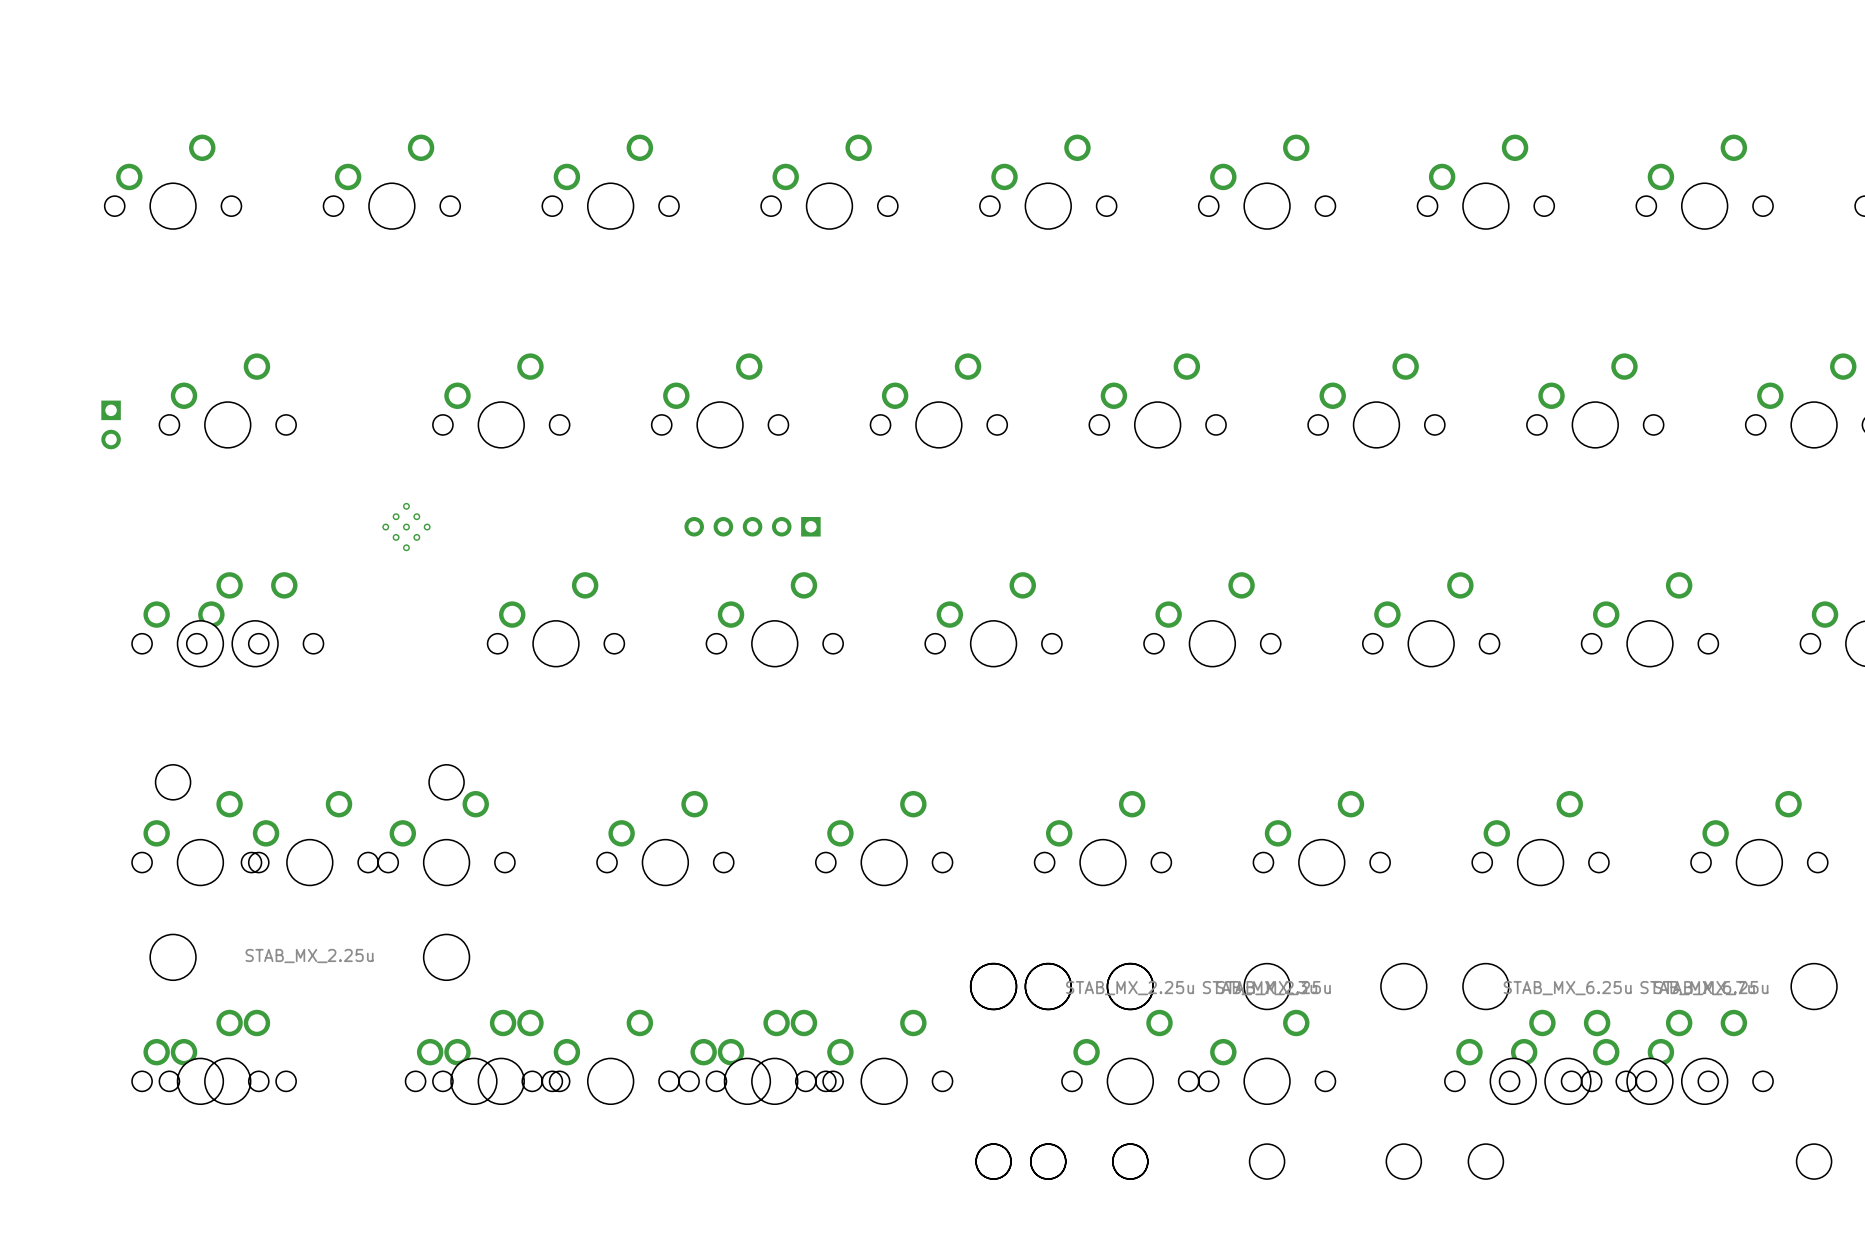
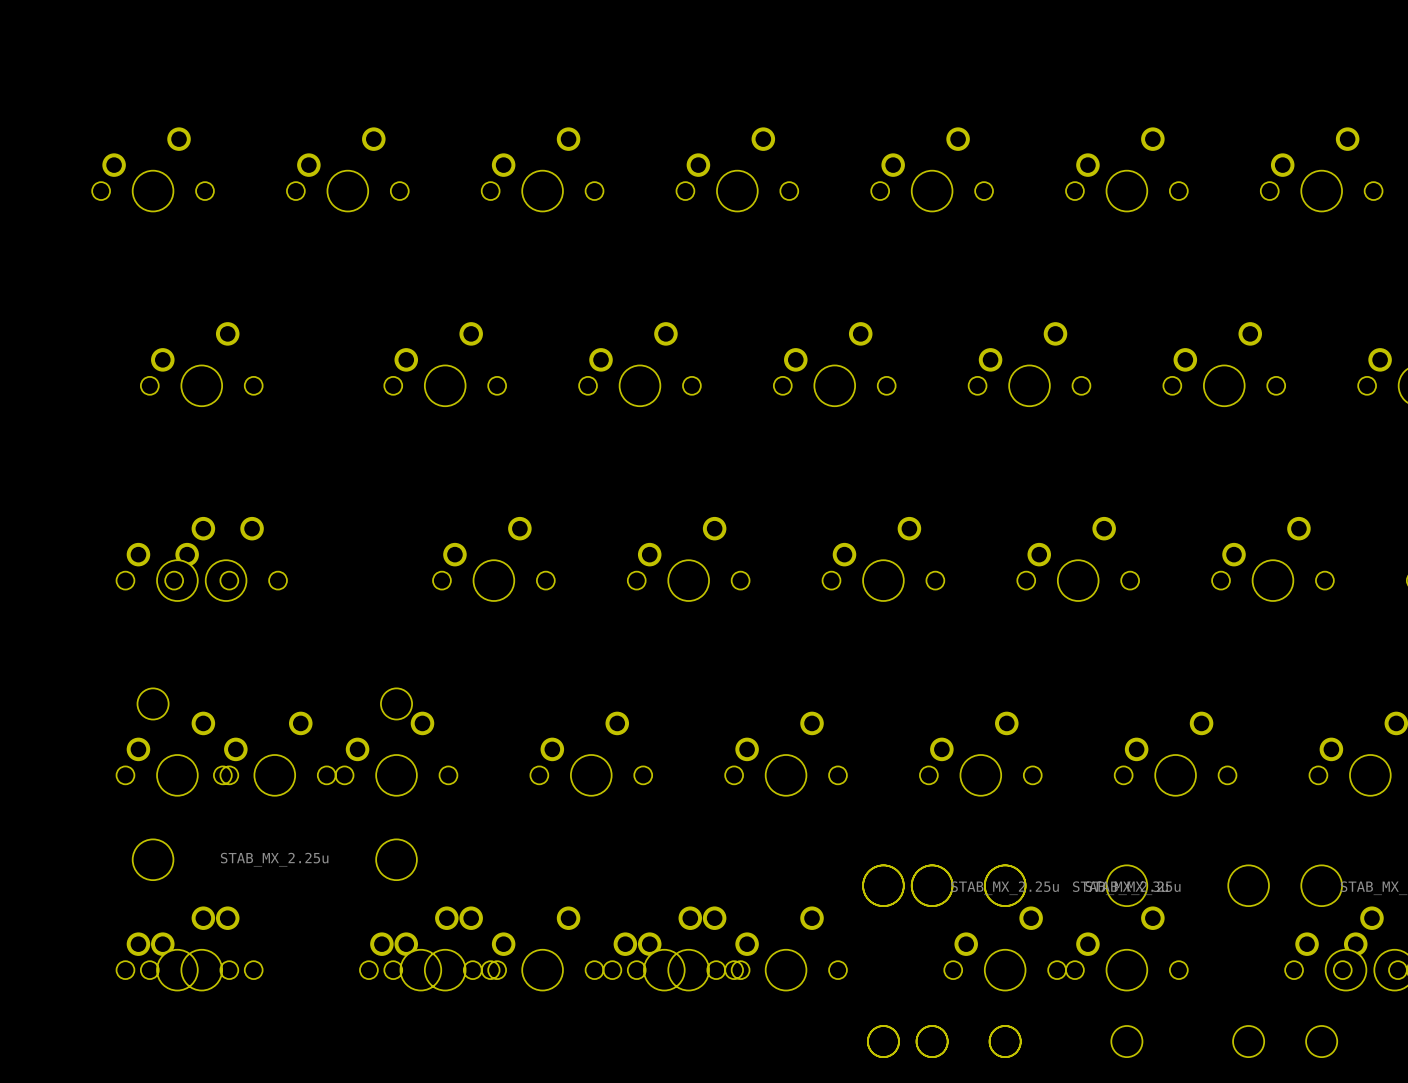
part: (111, 424) -> none
part: (752, 526) -> none
part: (406, 527) -> none

